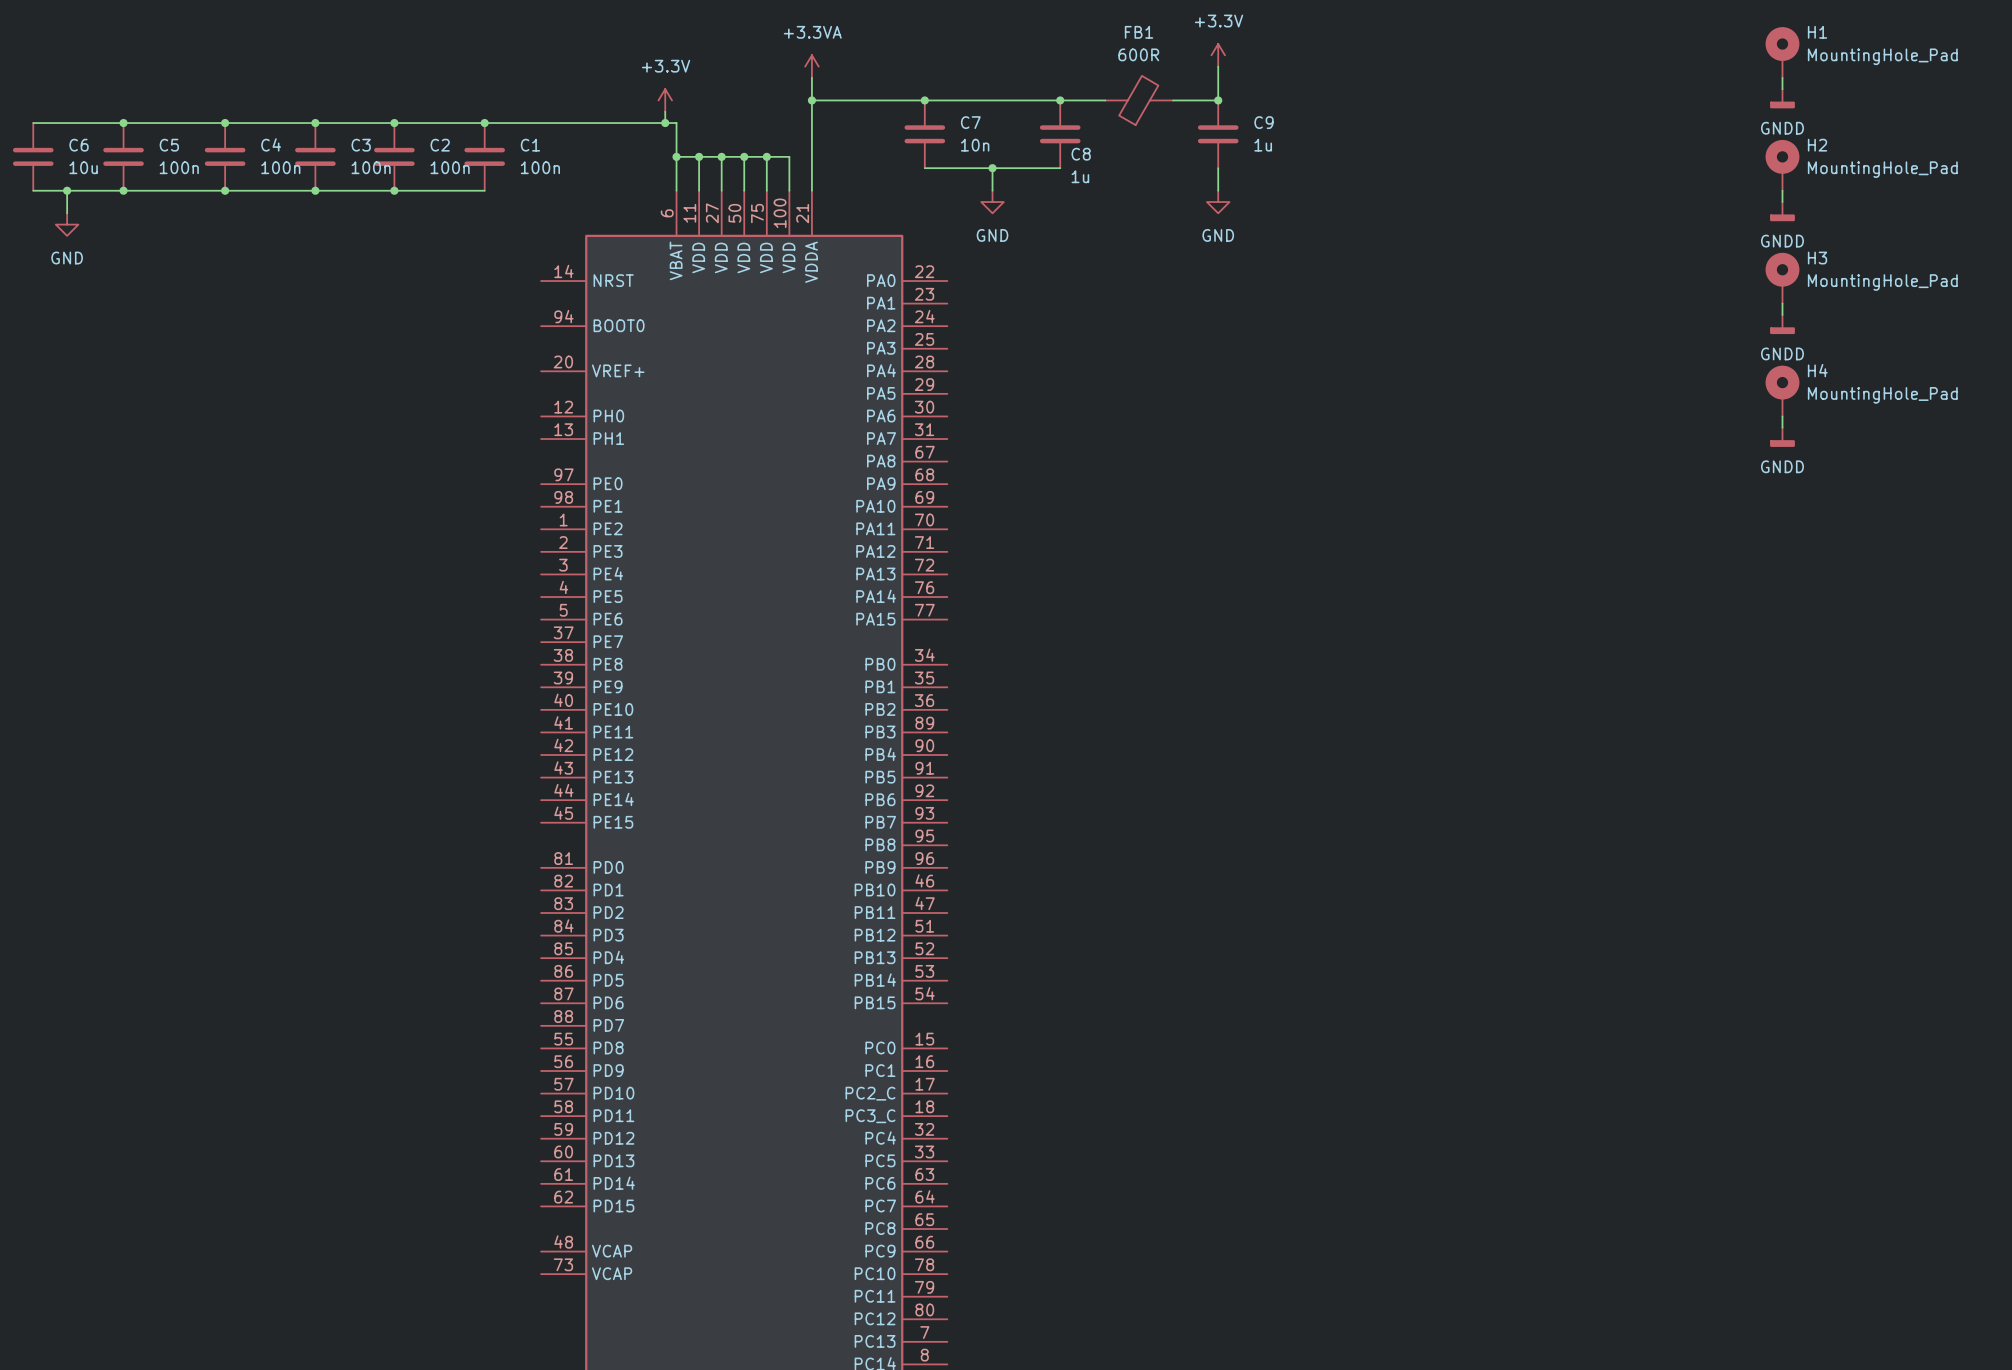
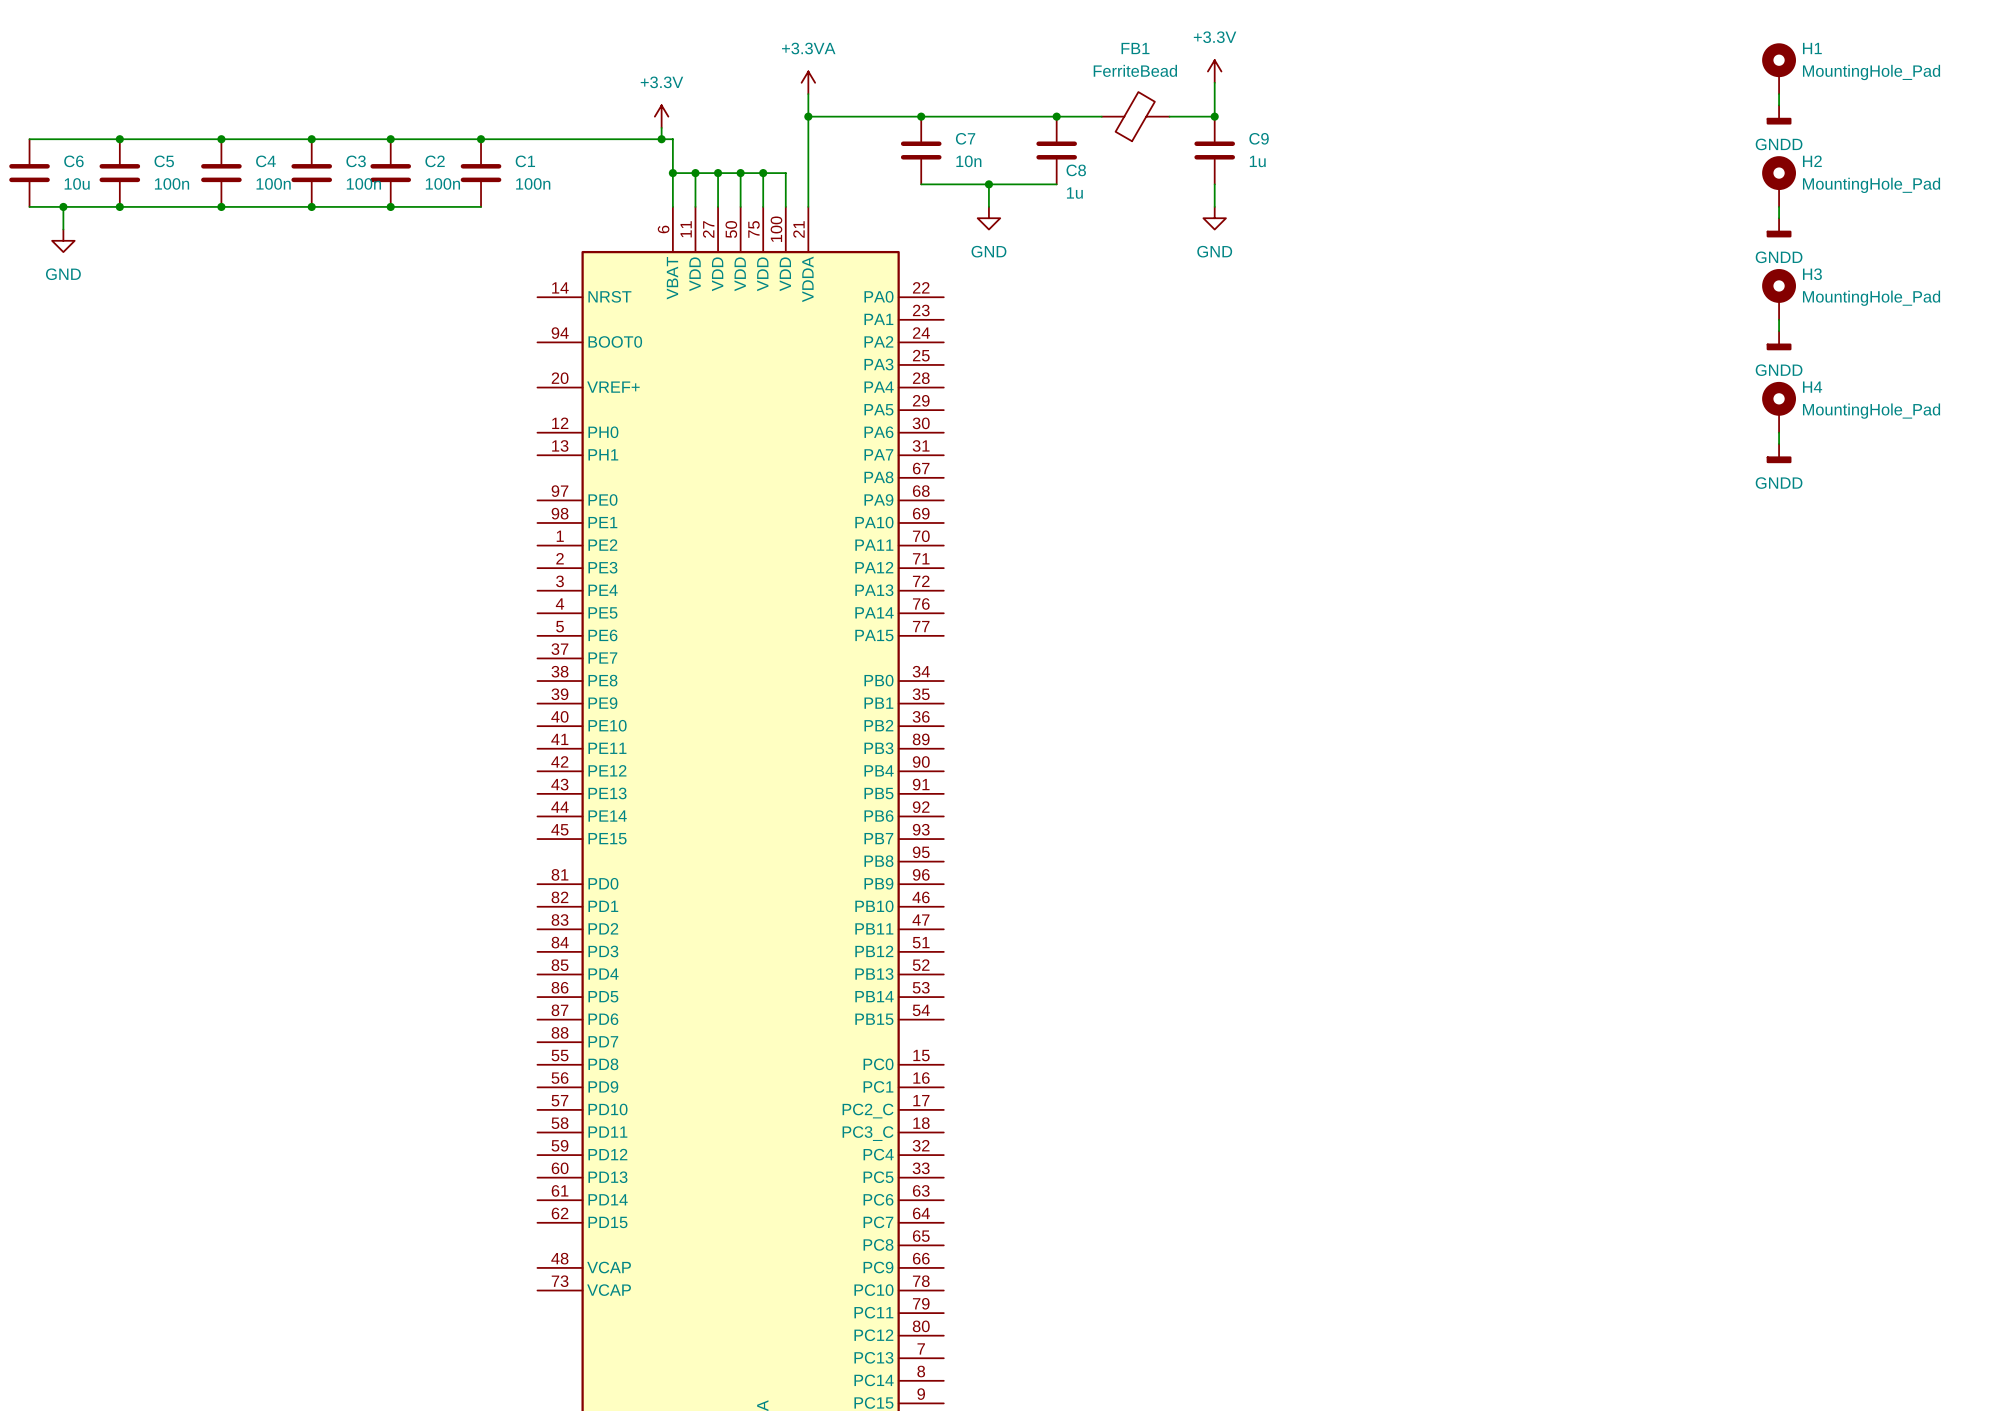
FB1 value: 600R (1138, 54) -> FerriteBead (1135, 70)

